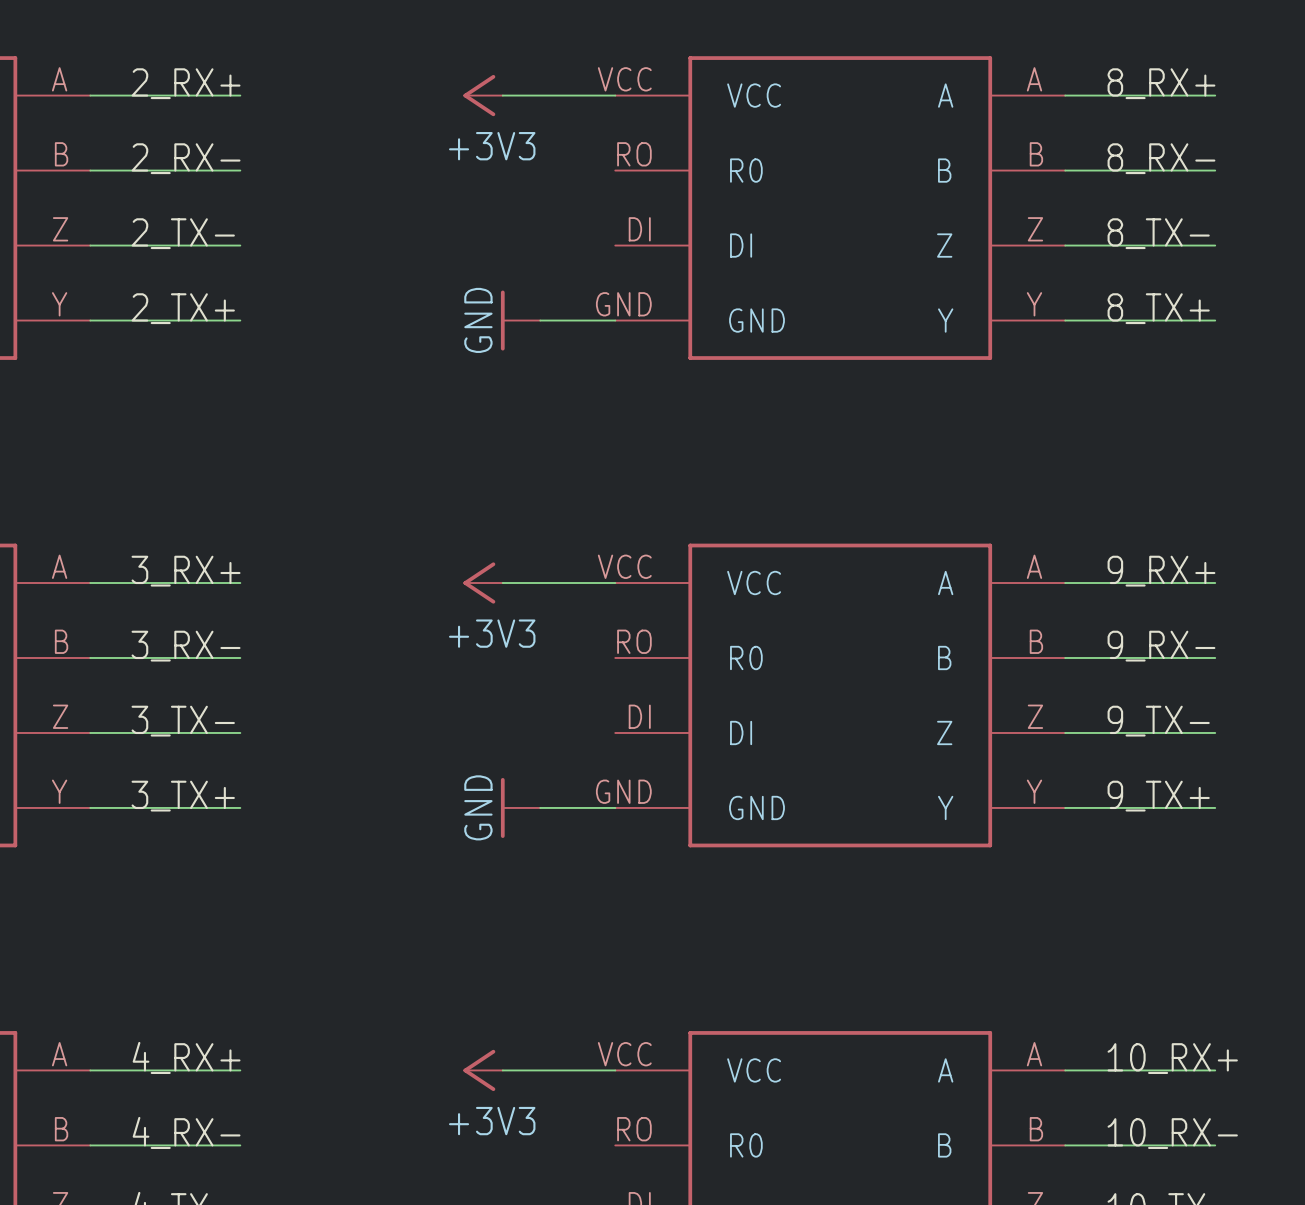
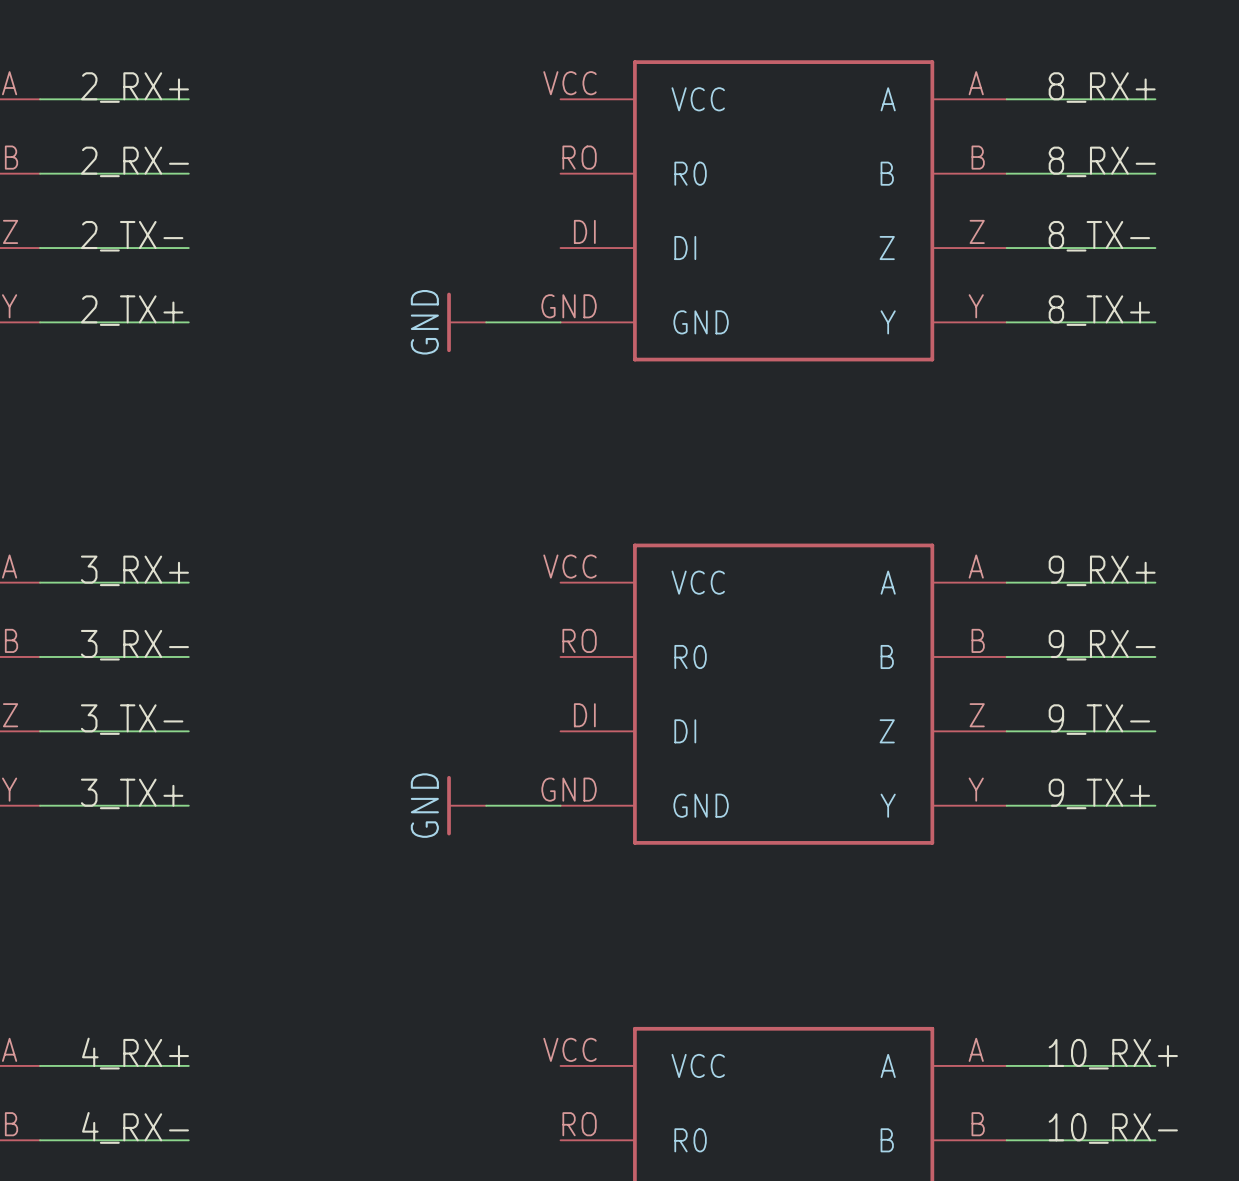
power symbol: +3V3 (483, 95) -> none
wire: (502, 95) (615, 95) -> none
power symbol: +3V3 (483, 583) -> none
wire: (502, 583) (615, 583) -> none
power symbol: +3V3 (483, 1070) -> none
wire: (502, 1070) (615, 1070) -> none

